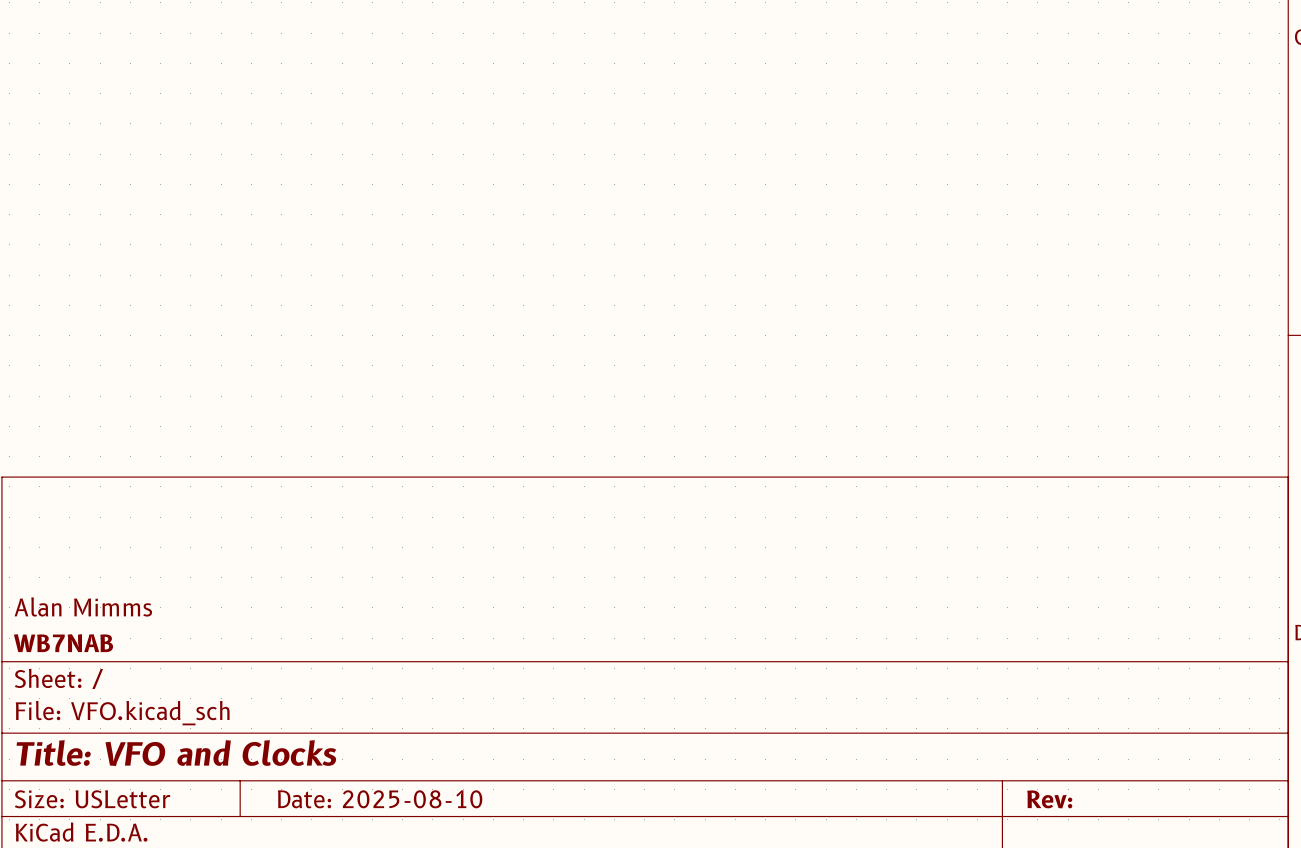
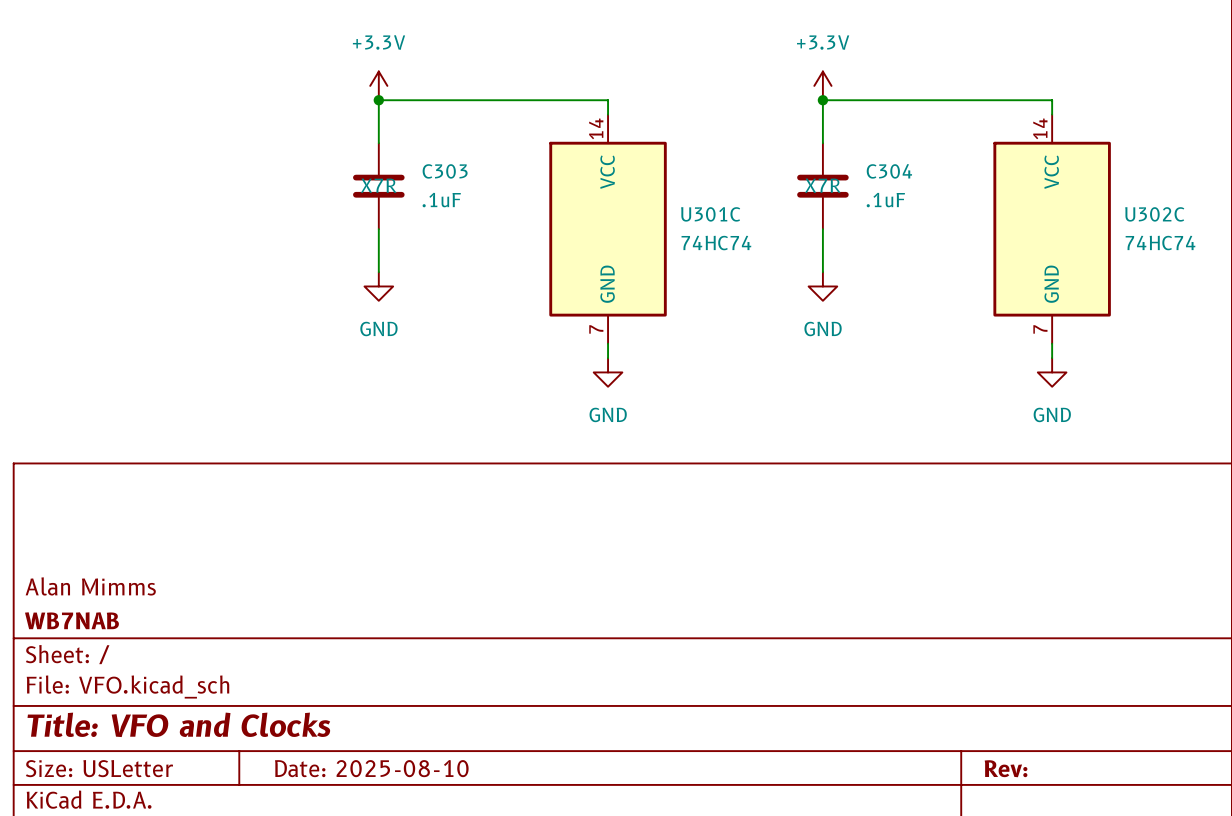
power symbol: none -> +3.3V (378, 85)
power symbol: none -> +3.3V (822, 85)
junction: none -> (378, 100)
junction: none -> (822, 100)
wire: none -> (608, 114) (608, 100) (378, 100) (378, 143)
wire: none -> (1052, 114) (1052, 100) (822, 100) (822, 143)
C303: none -> .1uF (378, 186)
C304: none -> .1uF (822, 186)
wire: none -> (378, 229) (378, 272)
U301C: none -> 74HC74 (608, 229)
wire: none -> (822, 229) (822, 272)
U302C: none -> 74HC74 (1052, 229)
power symbol: none -> GND (378, 286)
power symbol: none -> GND (822, 286)
wire: none -> (608, 343) (608, 358)
wire: none -> (1052, 343) (1052, 358)
power symbol: none -> GND (608, 372)
power symbol: none -> GND (1052, 372)

